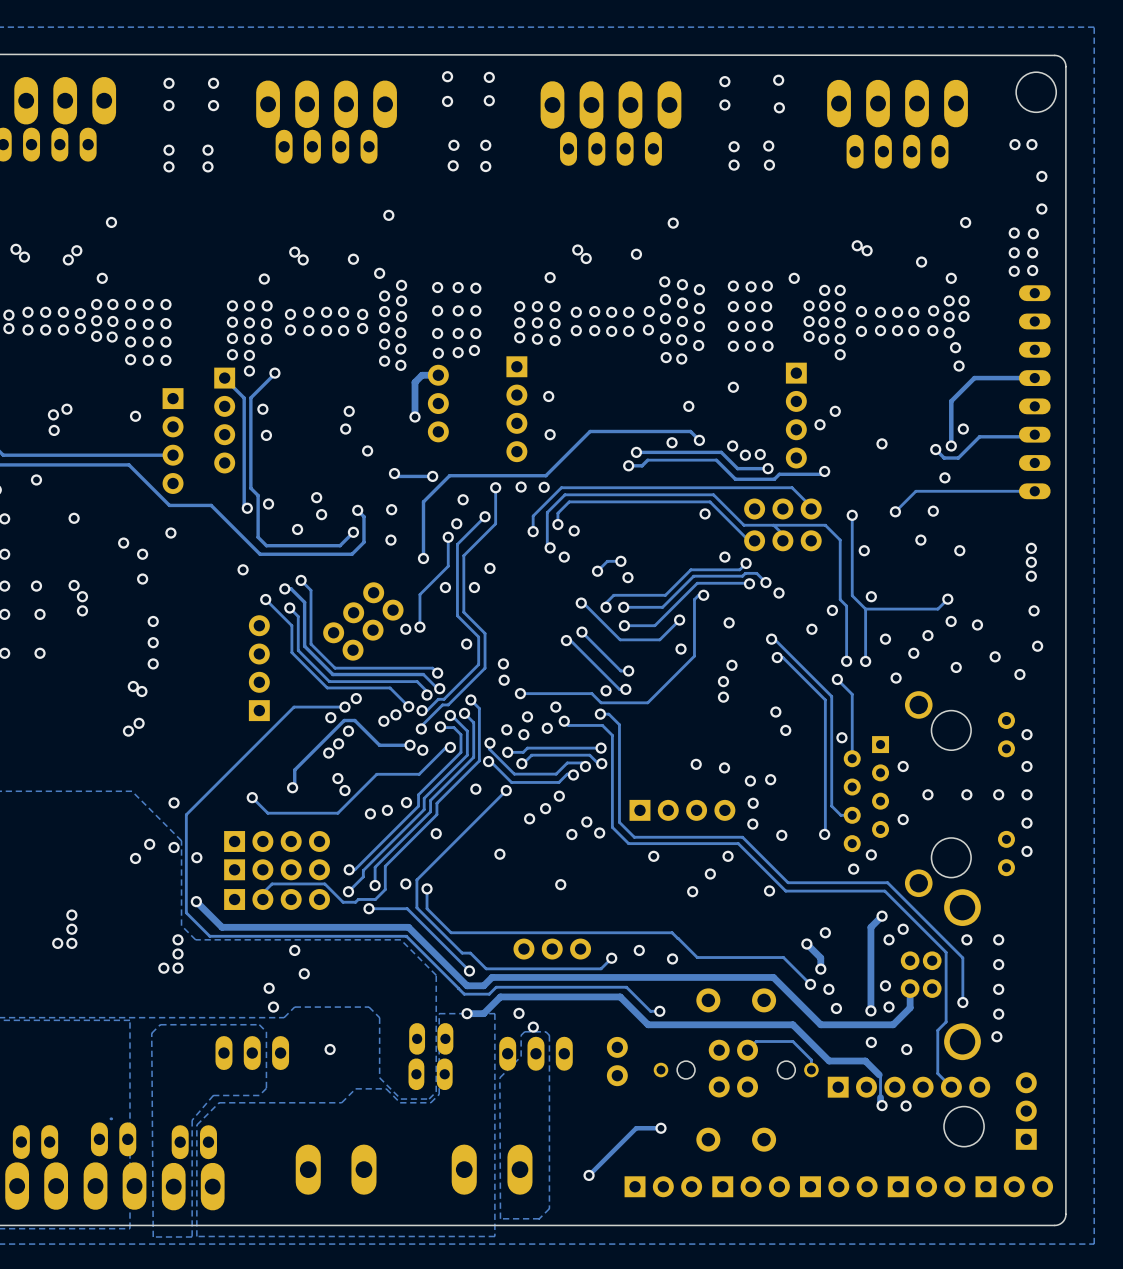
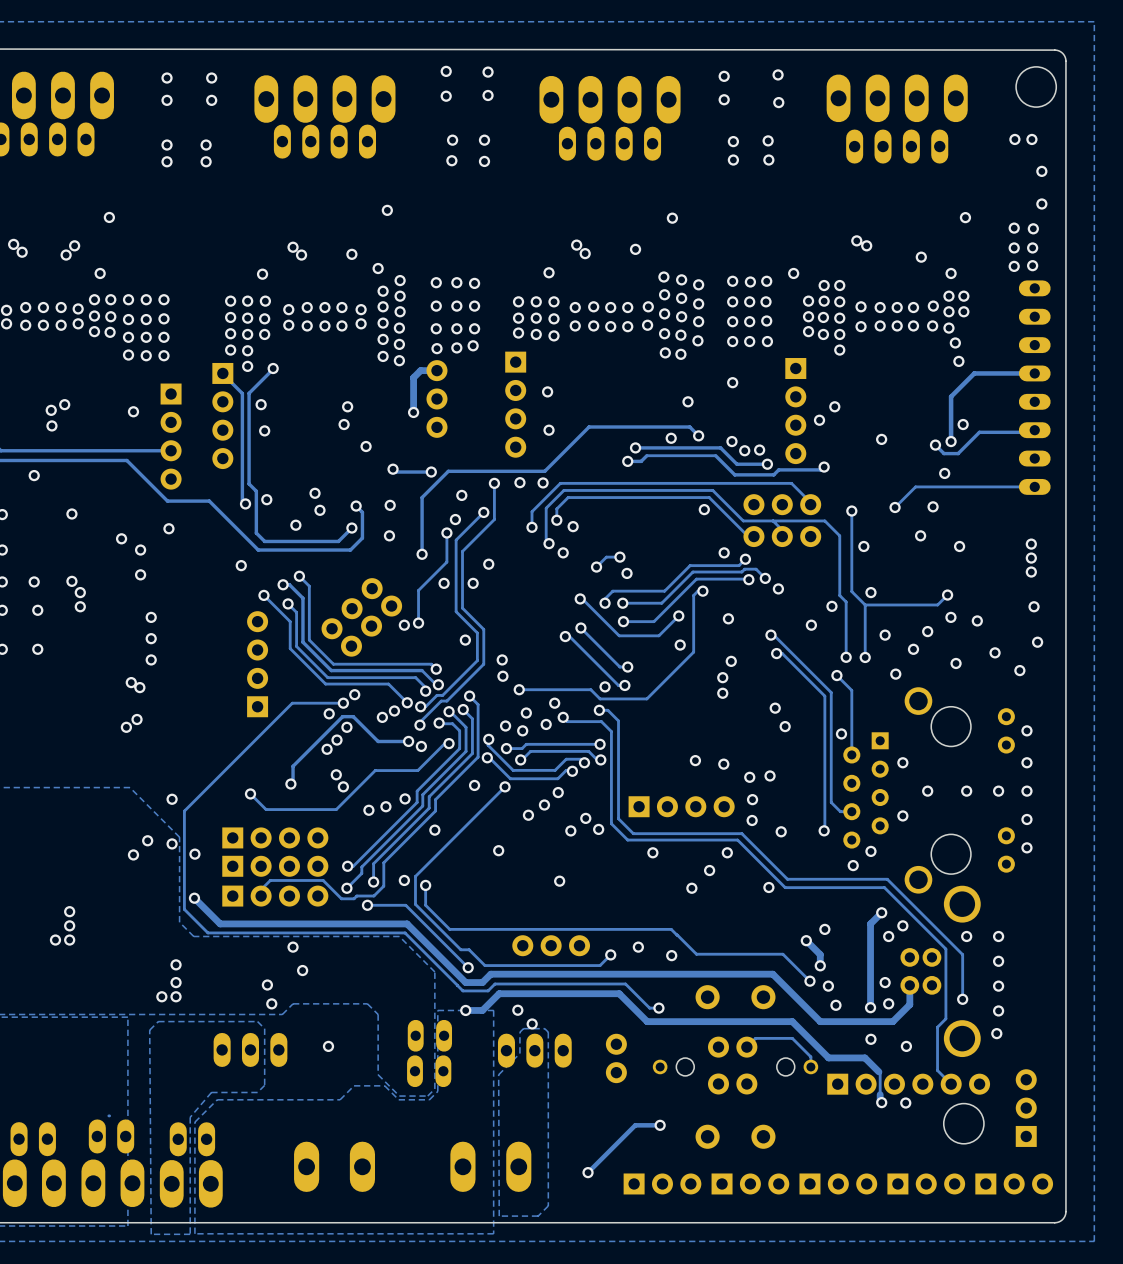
via: (177, 939) -> none
via: (177, 953) -> none
via: (163, 968) -> none
via: none -> (176, 982)
via: none -> (161, 996)
via: none -> (176, 996)

